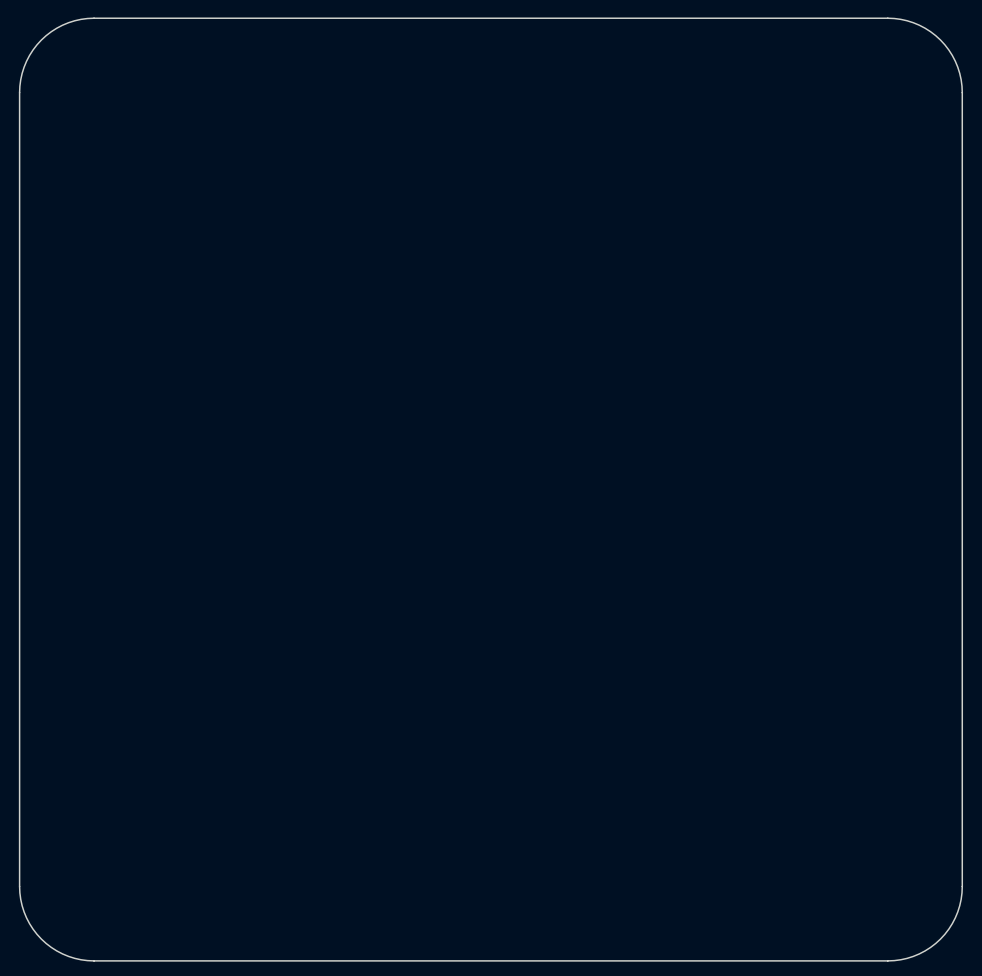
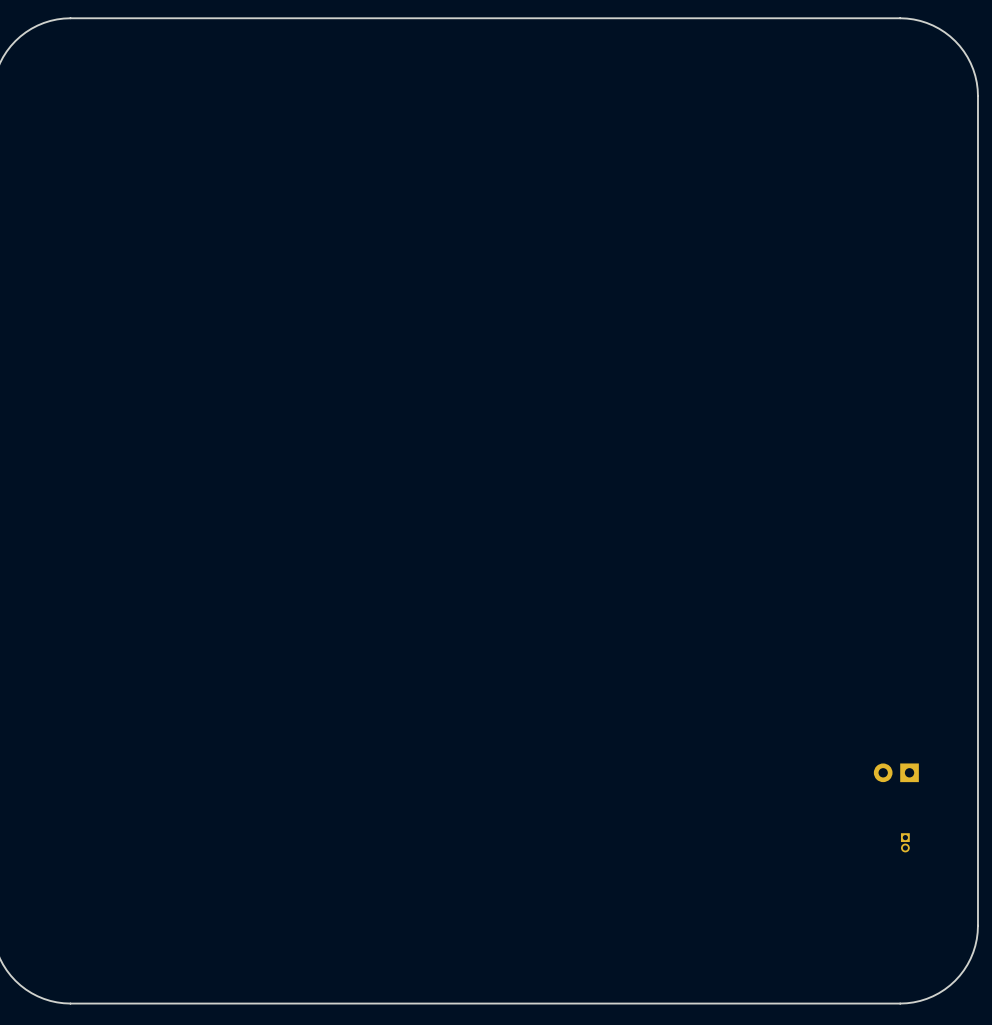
part: none -> (896, 772)
part: none -> (905, 842)

